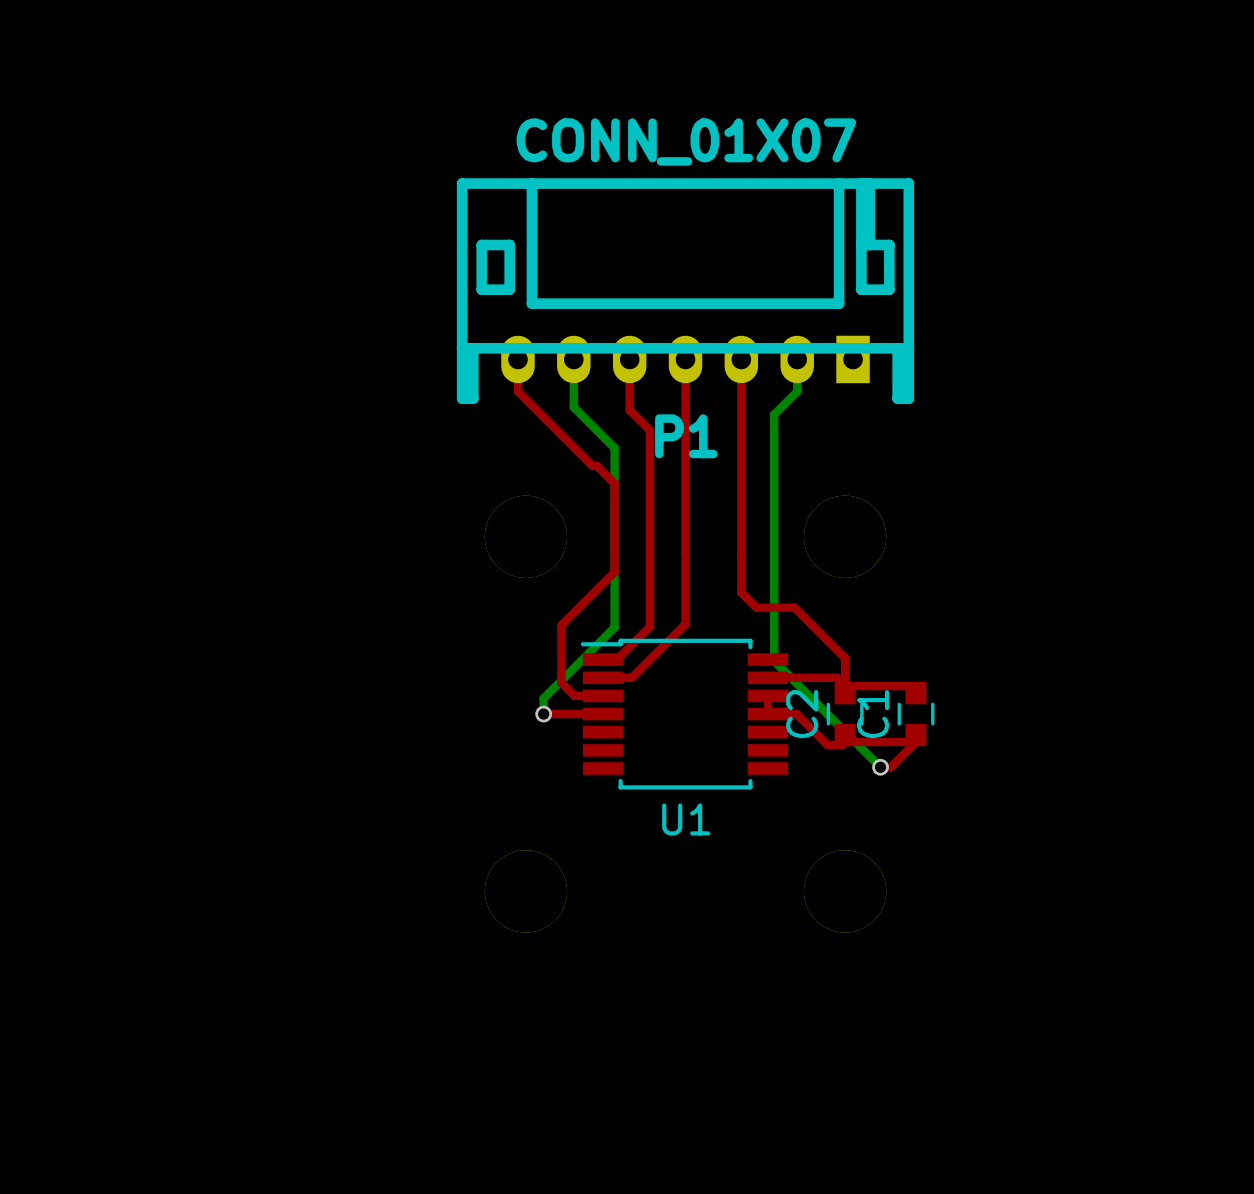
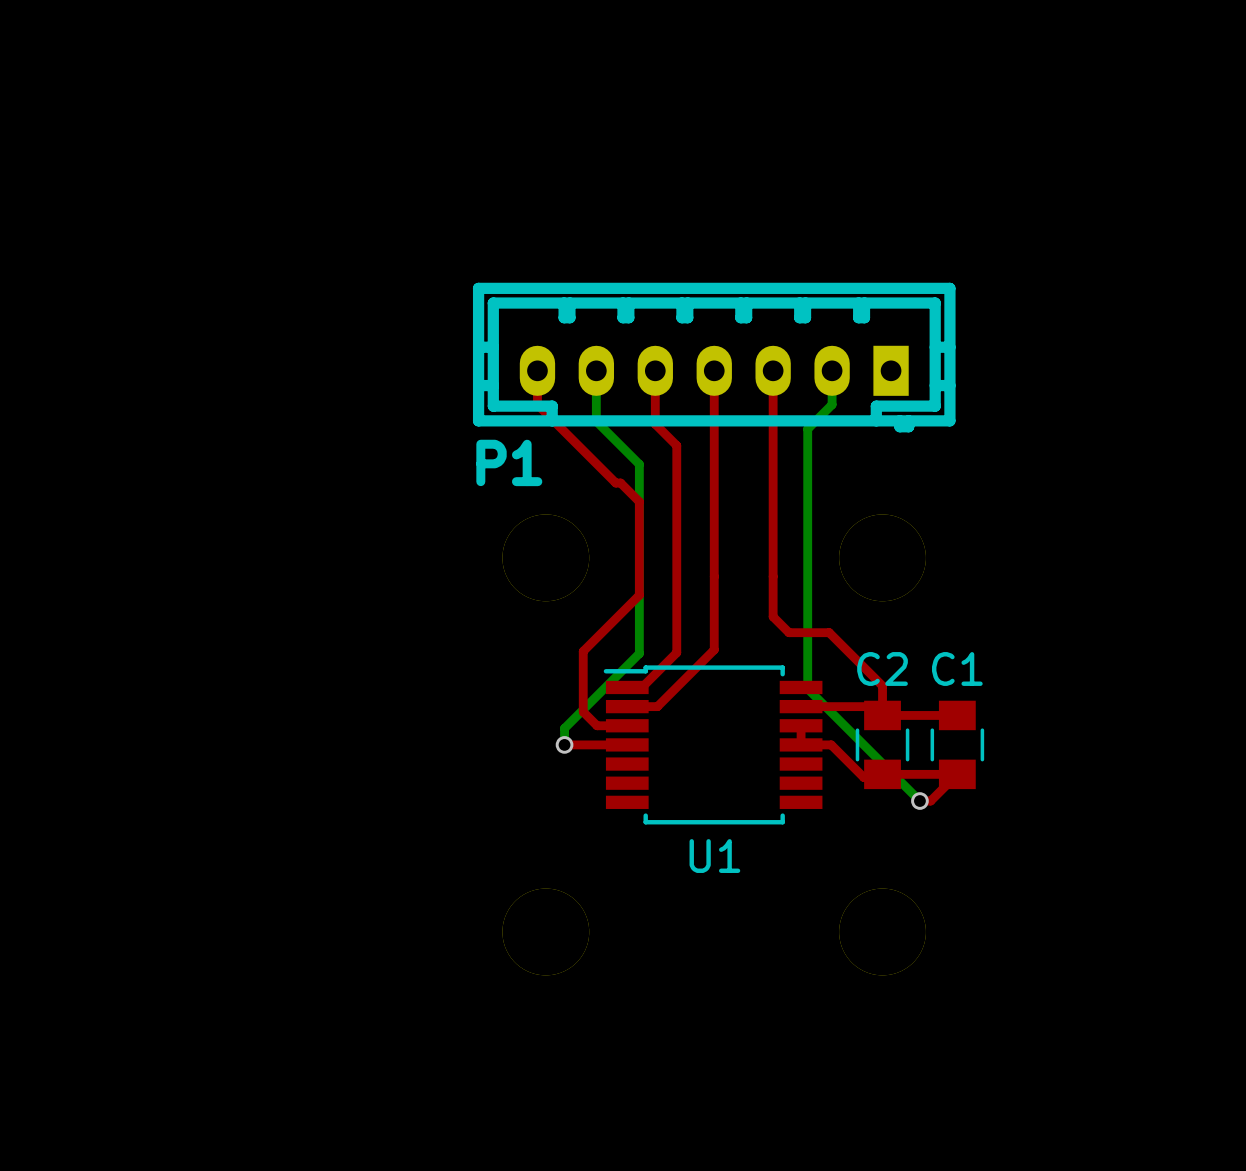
P1 value: CONN_01X07 (686, 142) -> none
P1 footprint: [456, 178, 915, 404] -> [472, 282, 956, 433]
P1 name position: P1 (686, 436) -> P1 (509, 462)
C2 footprint: [826, 681, 864, 747] -> [855, 700, 910, 790]
C1 footprint: [897, 681, 935, 747] -> [930, 700, 985, 790]
C2 name rotation: 0° (802, 714) -> 90° clockwise (882, 668)
C2 name position: C2 (802, 714) -> C2 (882, 668)
C1 name rotation: 0° (873, 714) -> 90° clockwise (957, 668)
C1 name position: C1 (873, 714) -> C1 (957, 668)

